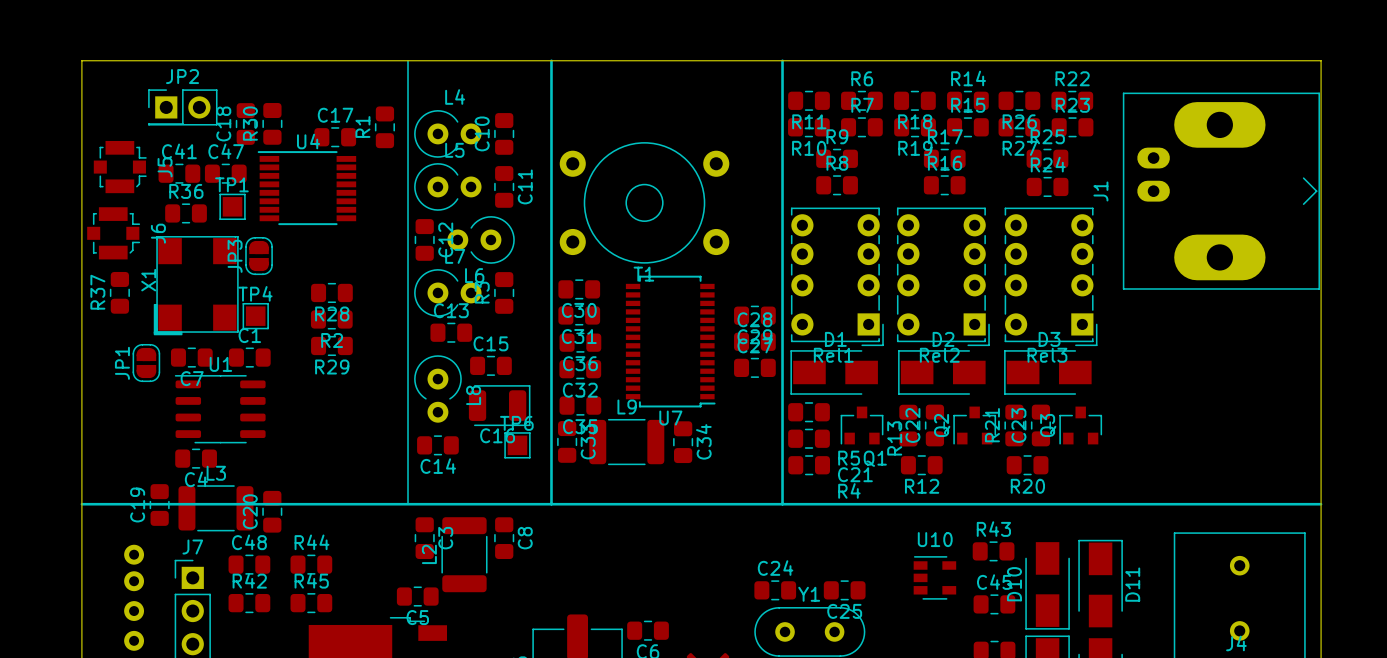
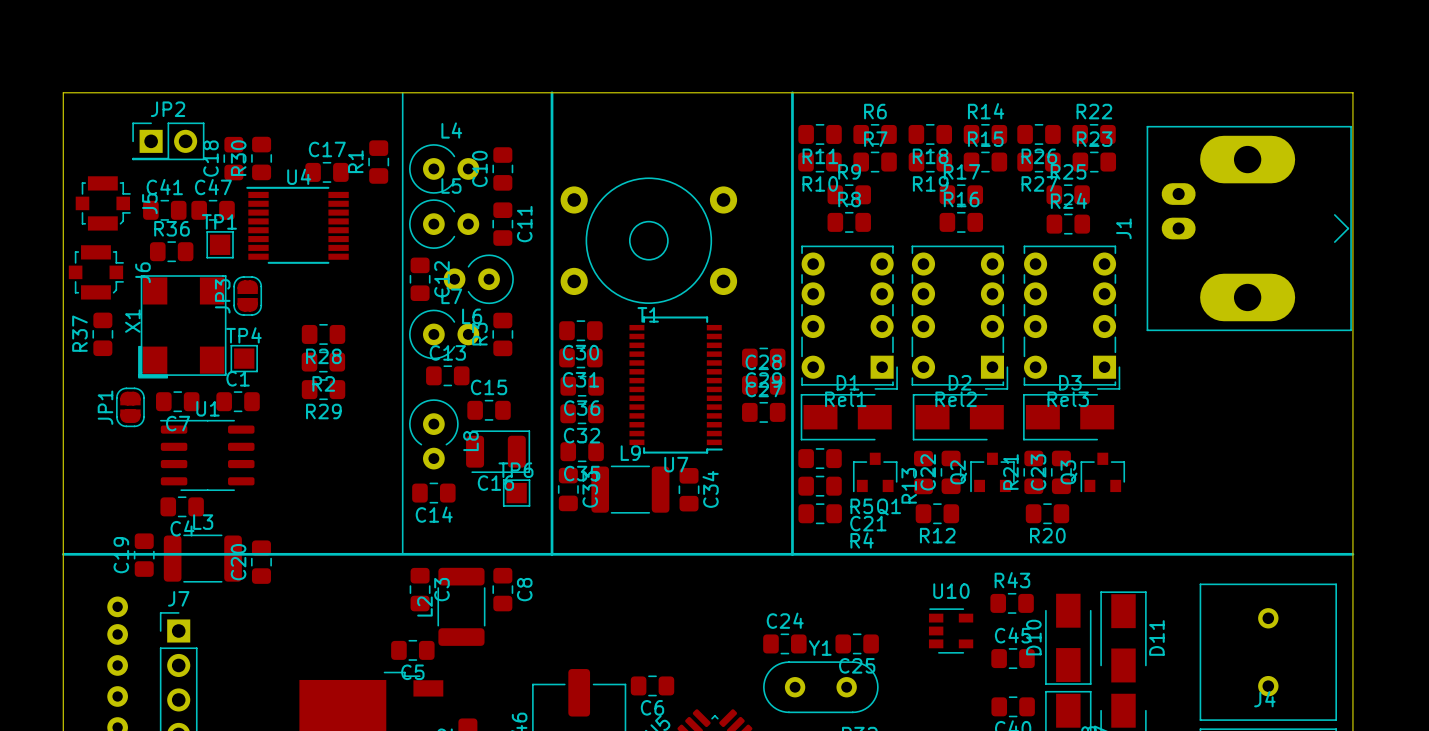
C48: (249, 564) -> none
R44: (311, 564) -> none
R42: (249, 603) -> none
R45: (311, 603) -> none

